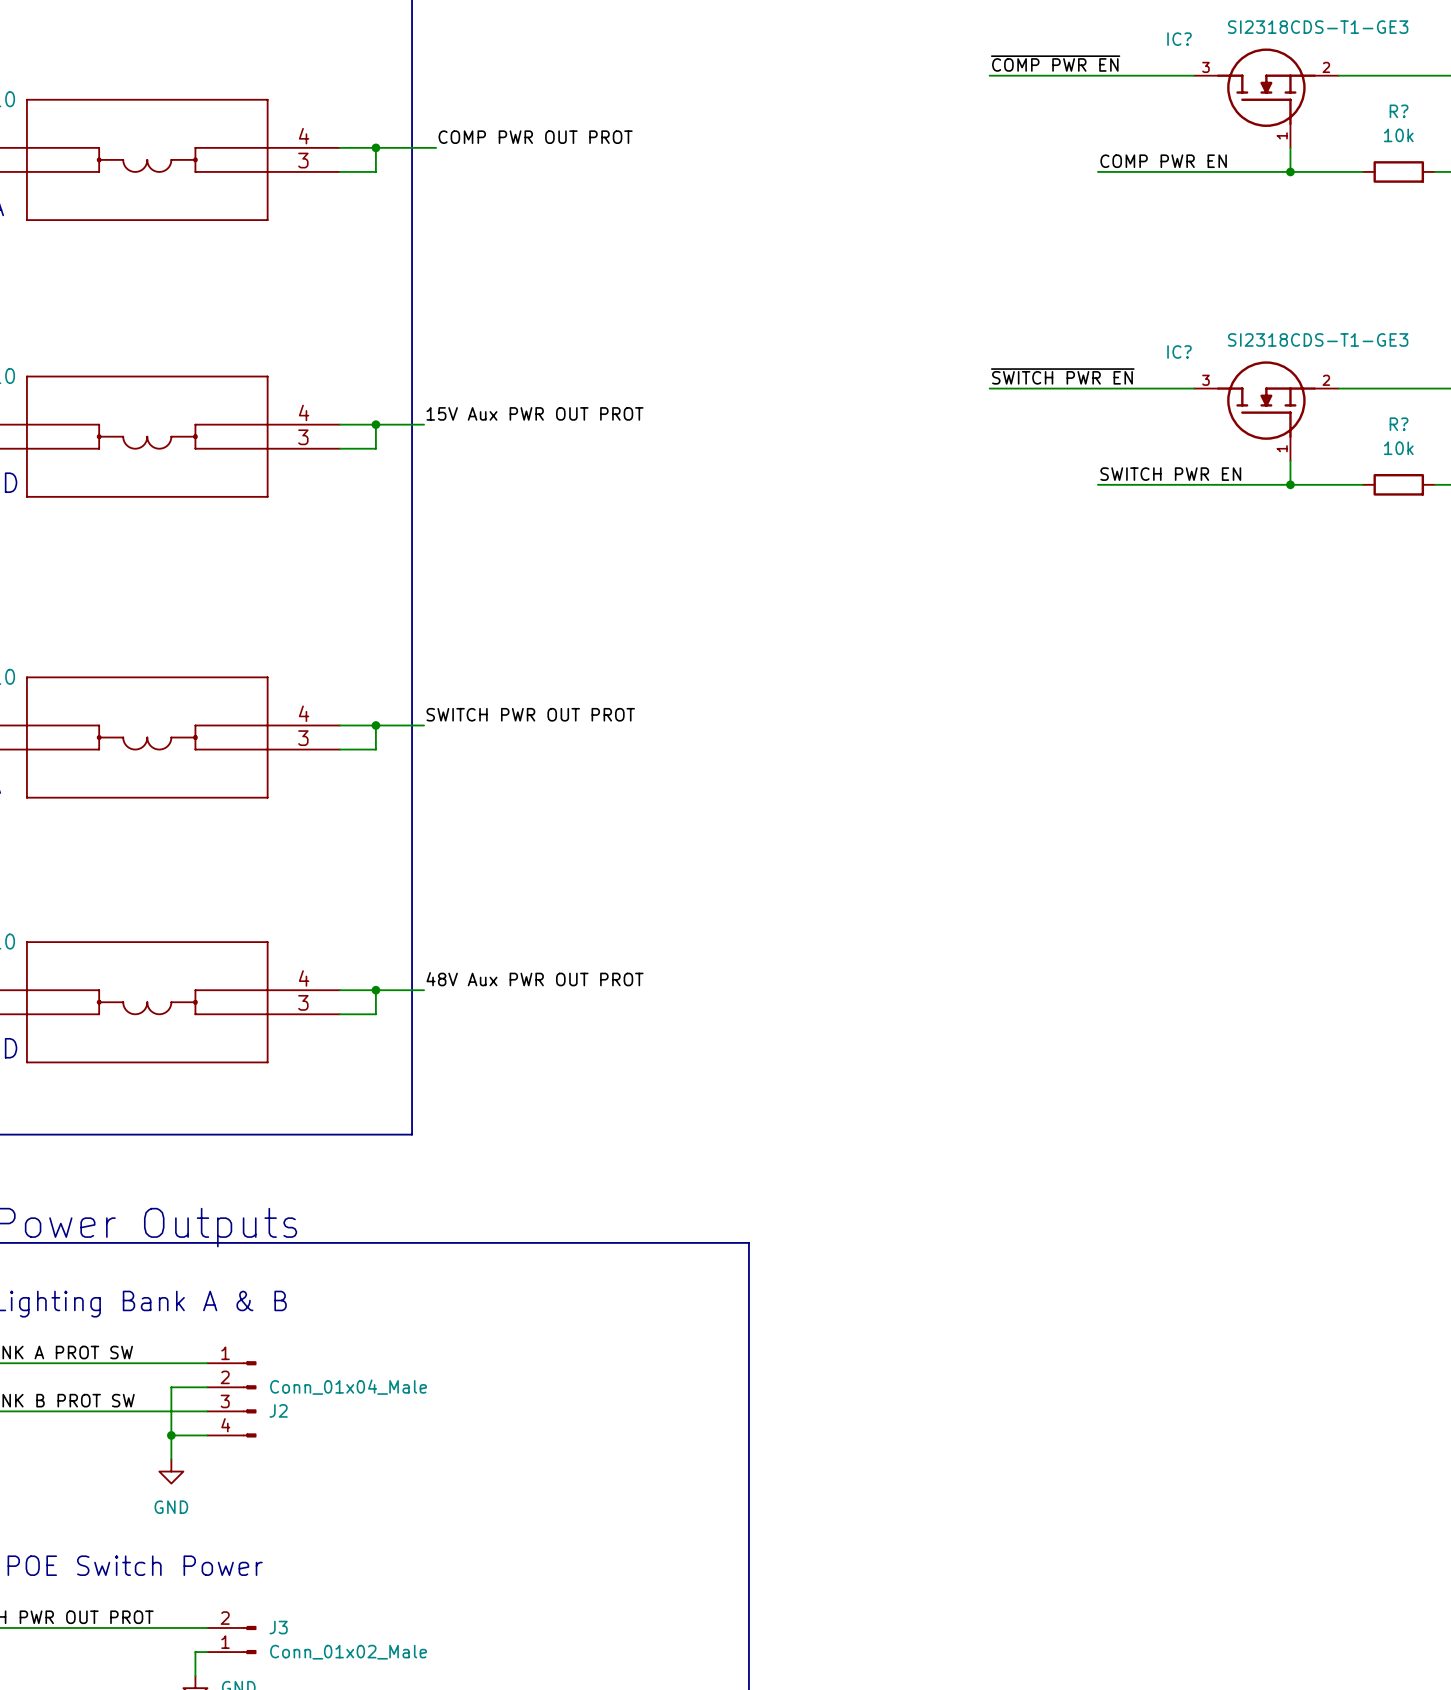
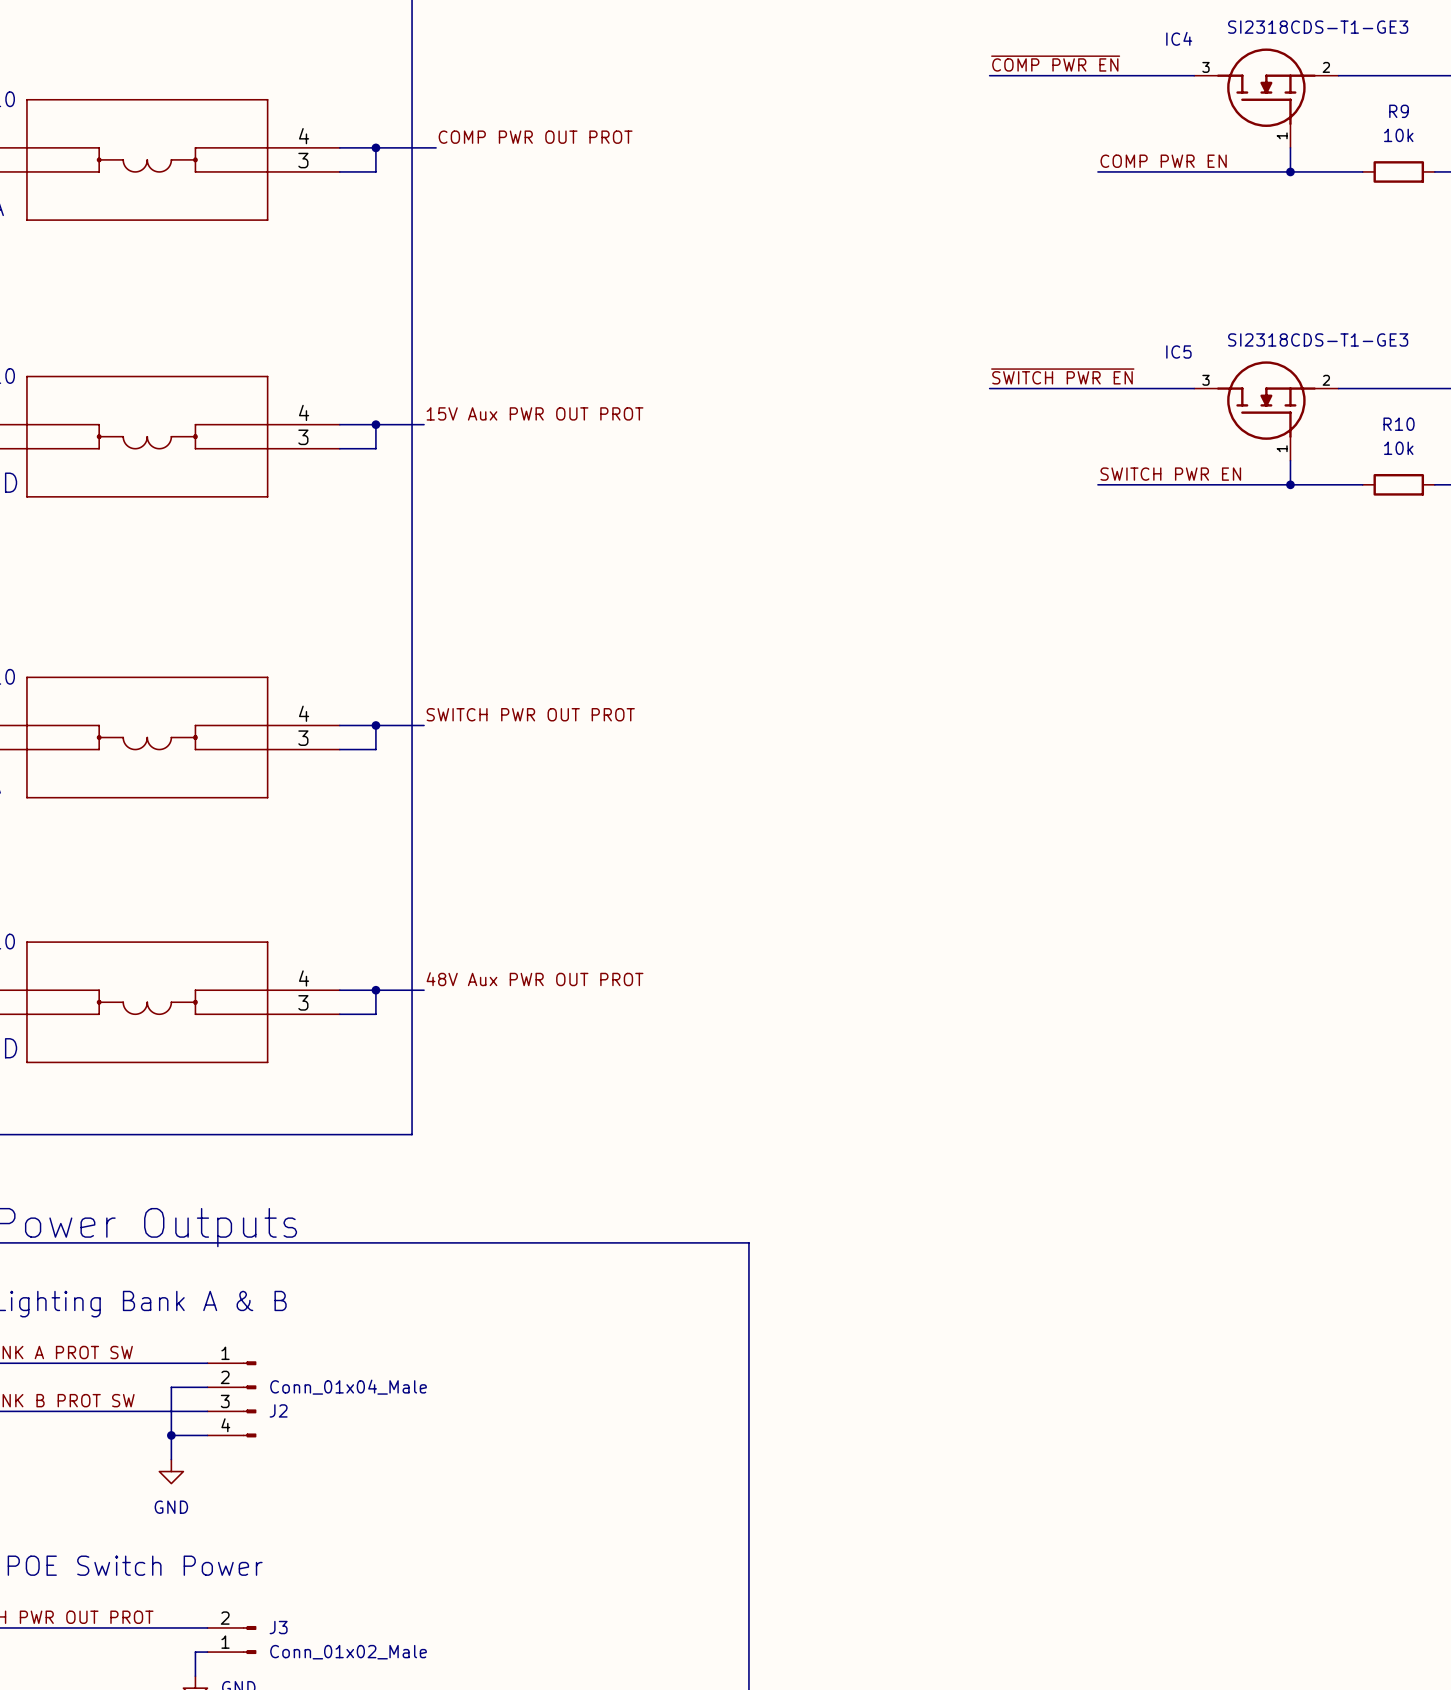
IC? name: IC? (1179, 39) -> IC4 (1179, 38)
R? name: R? (1399, 111) -> R9 (1399, 111)
IC? name: IC? (1179, 352) -> IC5 (1178, 352)
R? name: R? (1399, 424) -> R10 (1399, 424)

